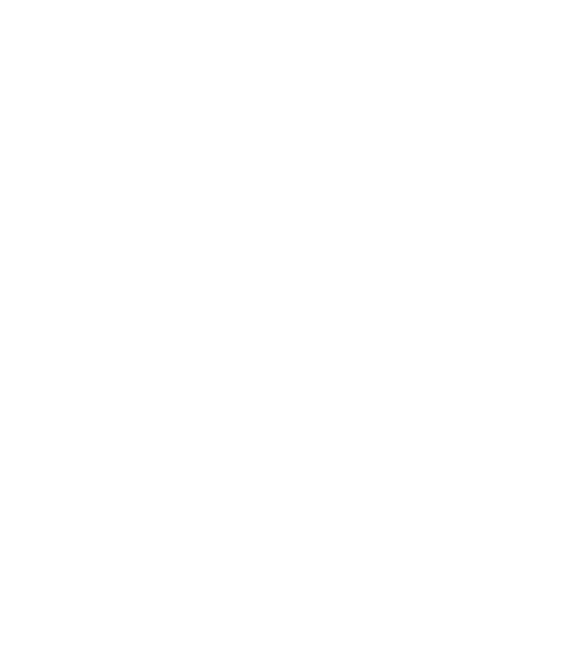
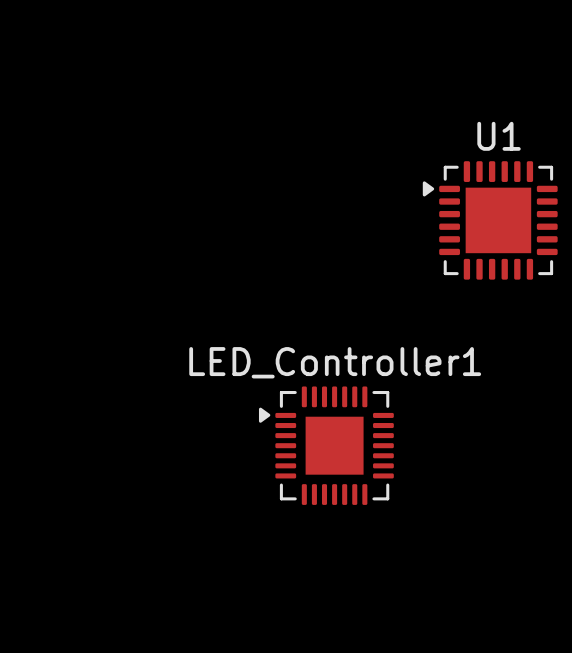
U1: none -> (490, 220)
LED_Controller1: none -> (326, 445)

